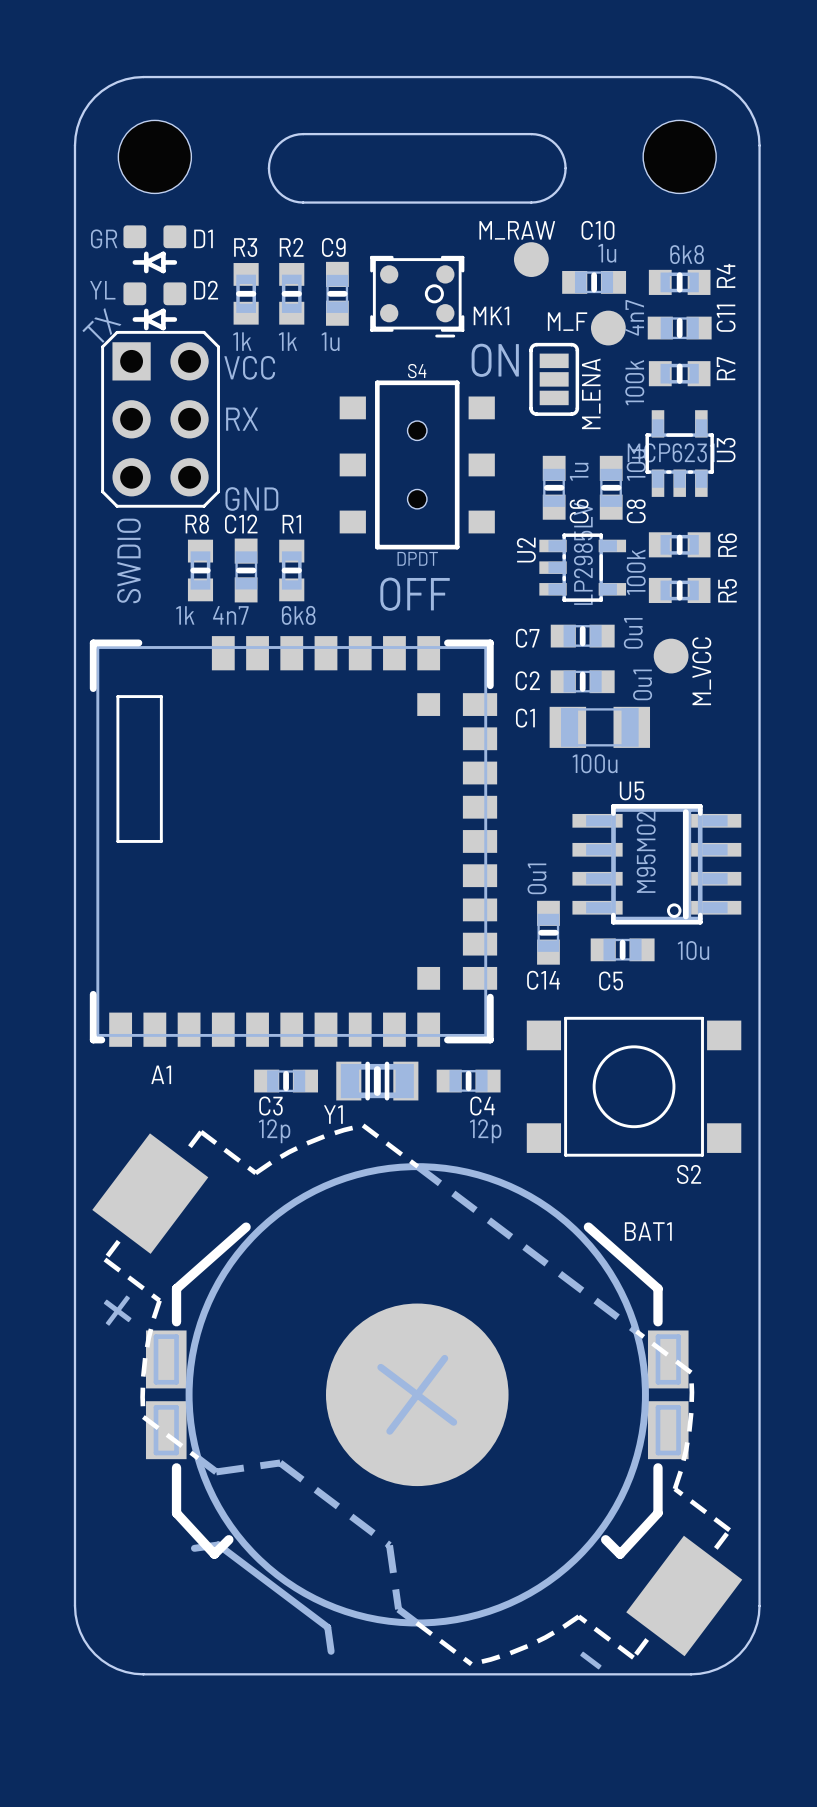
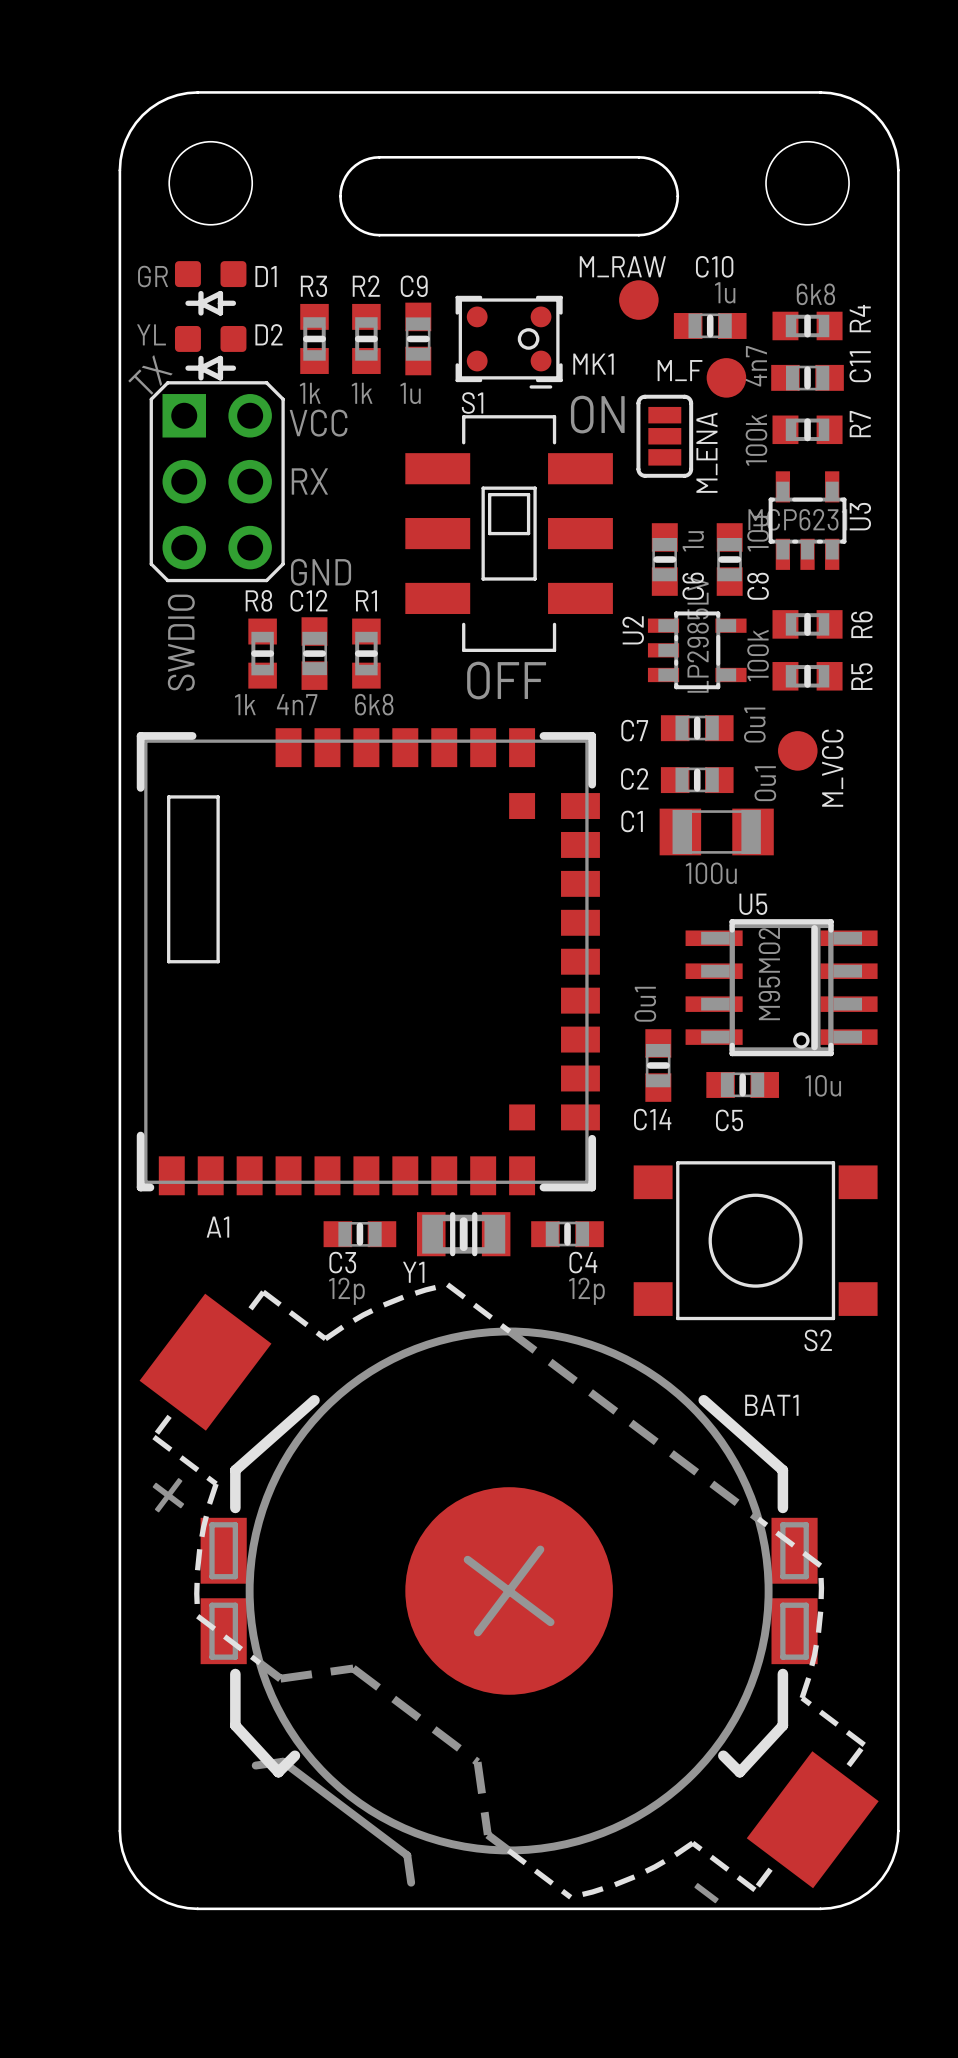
S4: DPDT (417, 464) -> none
S1: none -> (509, 533)

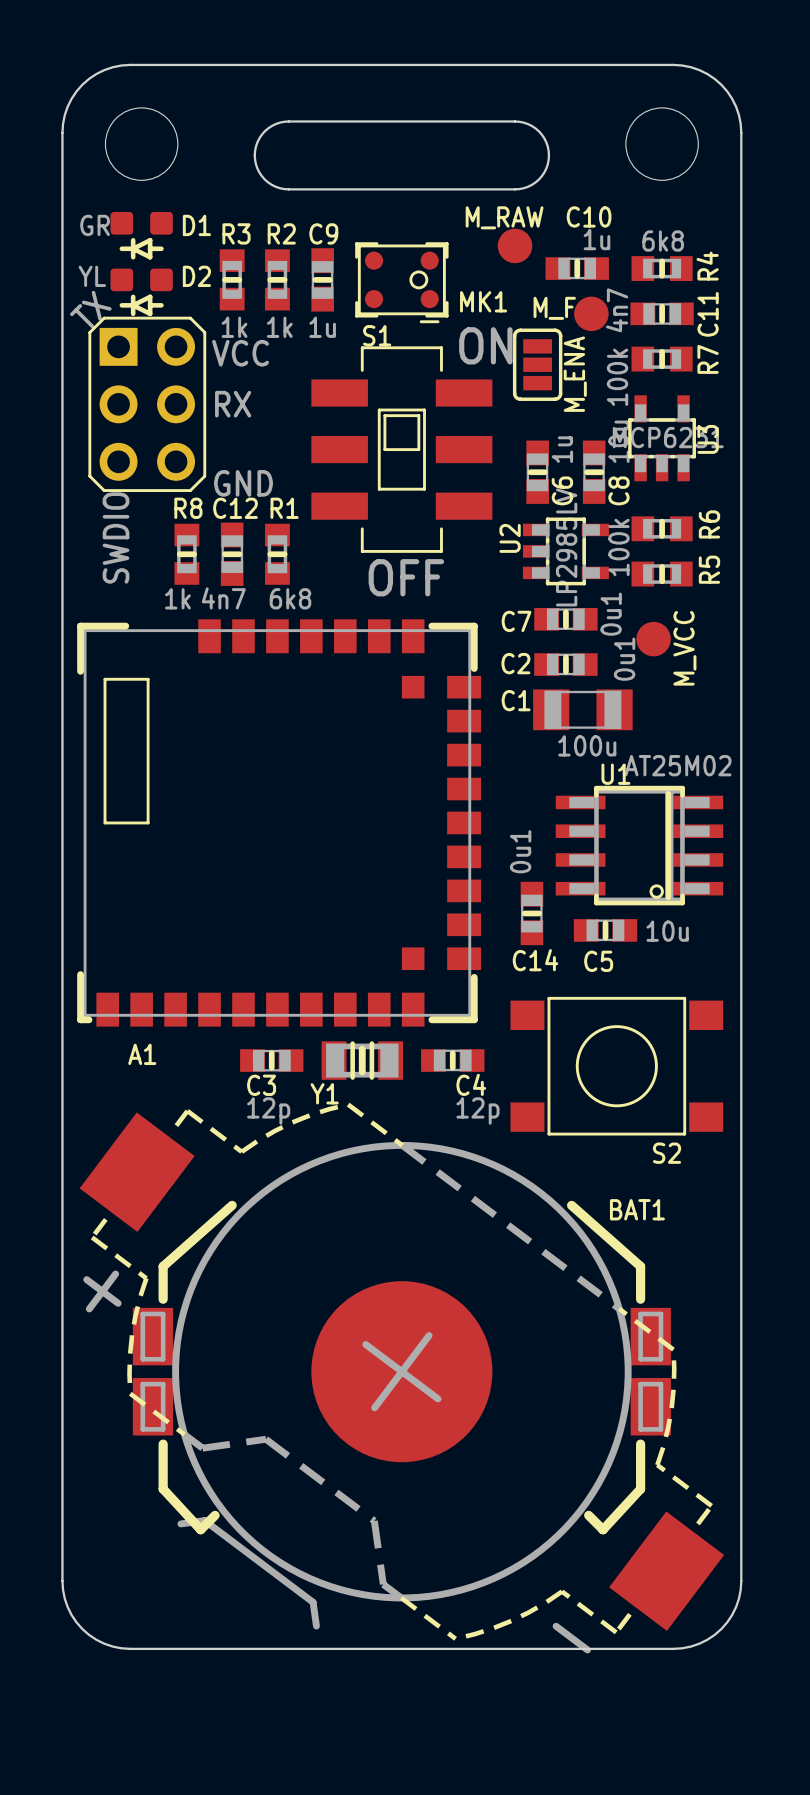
C7 value position: 0u1 (754, 725) -> 0u1 (624, 659)
C2 value position: 0u1 (765, 783) -> 0u1 (611, 614)
U5 name: U5 (753, 904) -> U1 (615, 774)
U5 value: M95M02 (769, 973) -> AT25M02 (678, 765)

